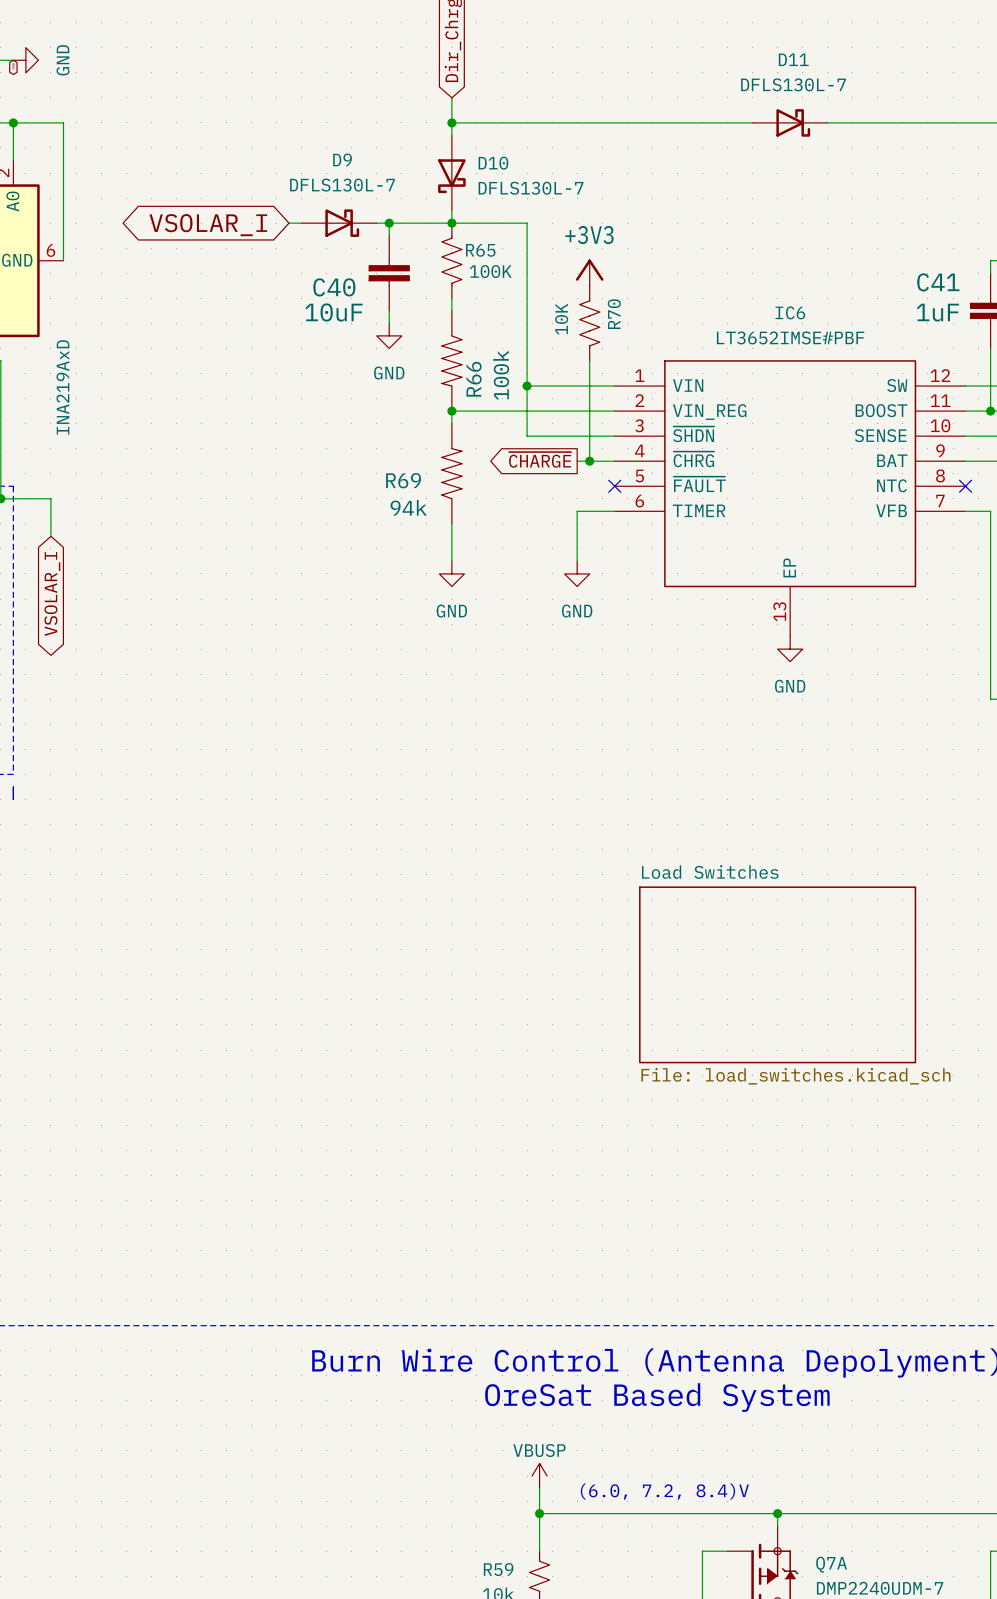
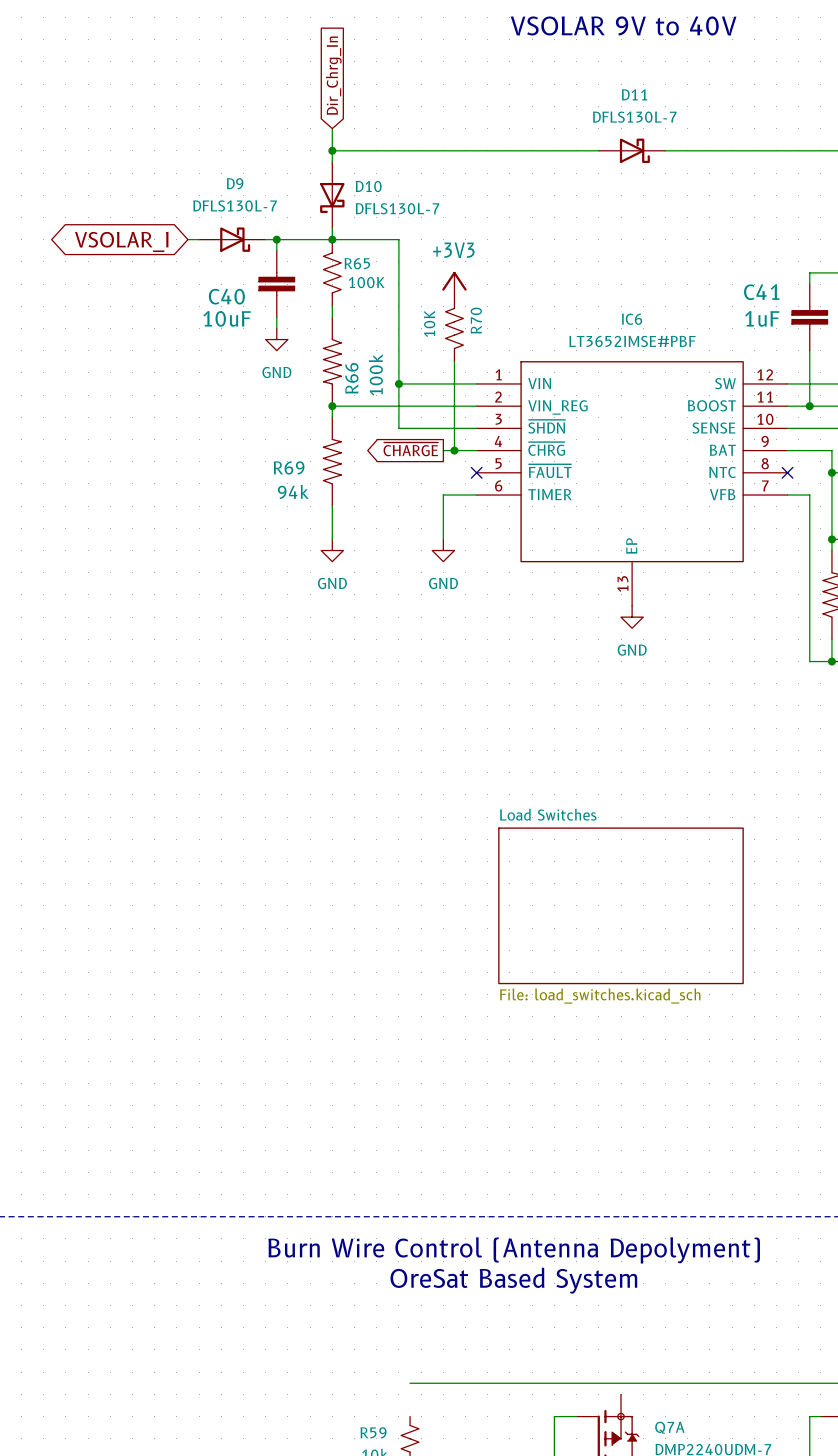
power symbol: VBUSP (539, 1476) -> none
wire: (539, 1488) (539, 1551) -> none
text: (6.0, 7.2, 8.4)V (664, 1491) -> none
junction: (539, 1513) -> none
wire: (777, 1513) (777, 1526) -> none
junction: (777, 1513) -> none

